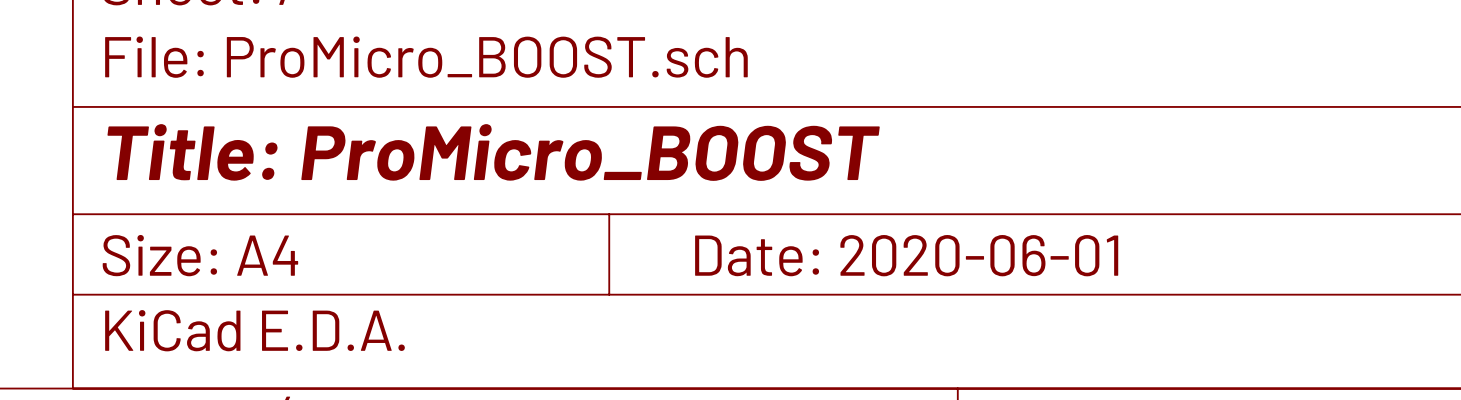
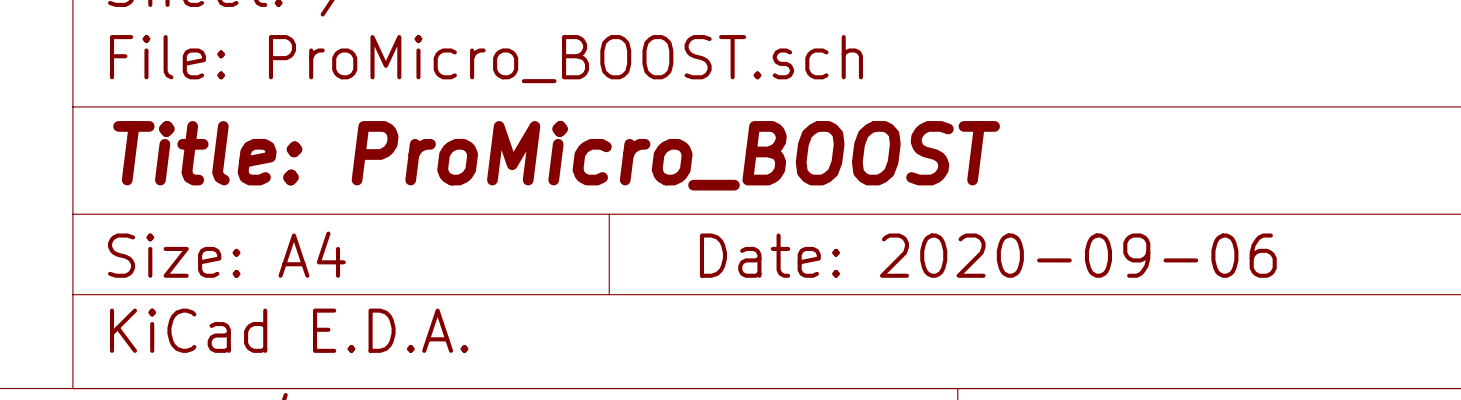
title block: Date: 2020-06-01 (906, 255) -> Date: 2020-09-06 (988, 255)

